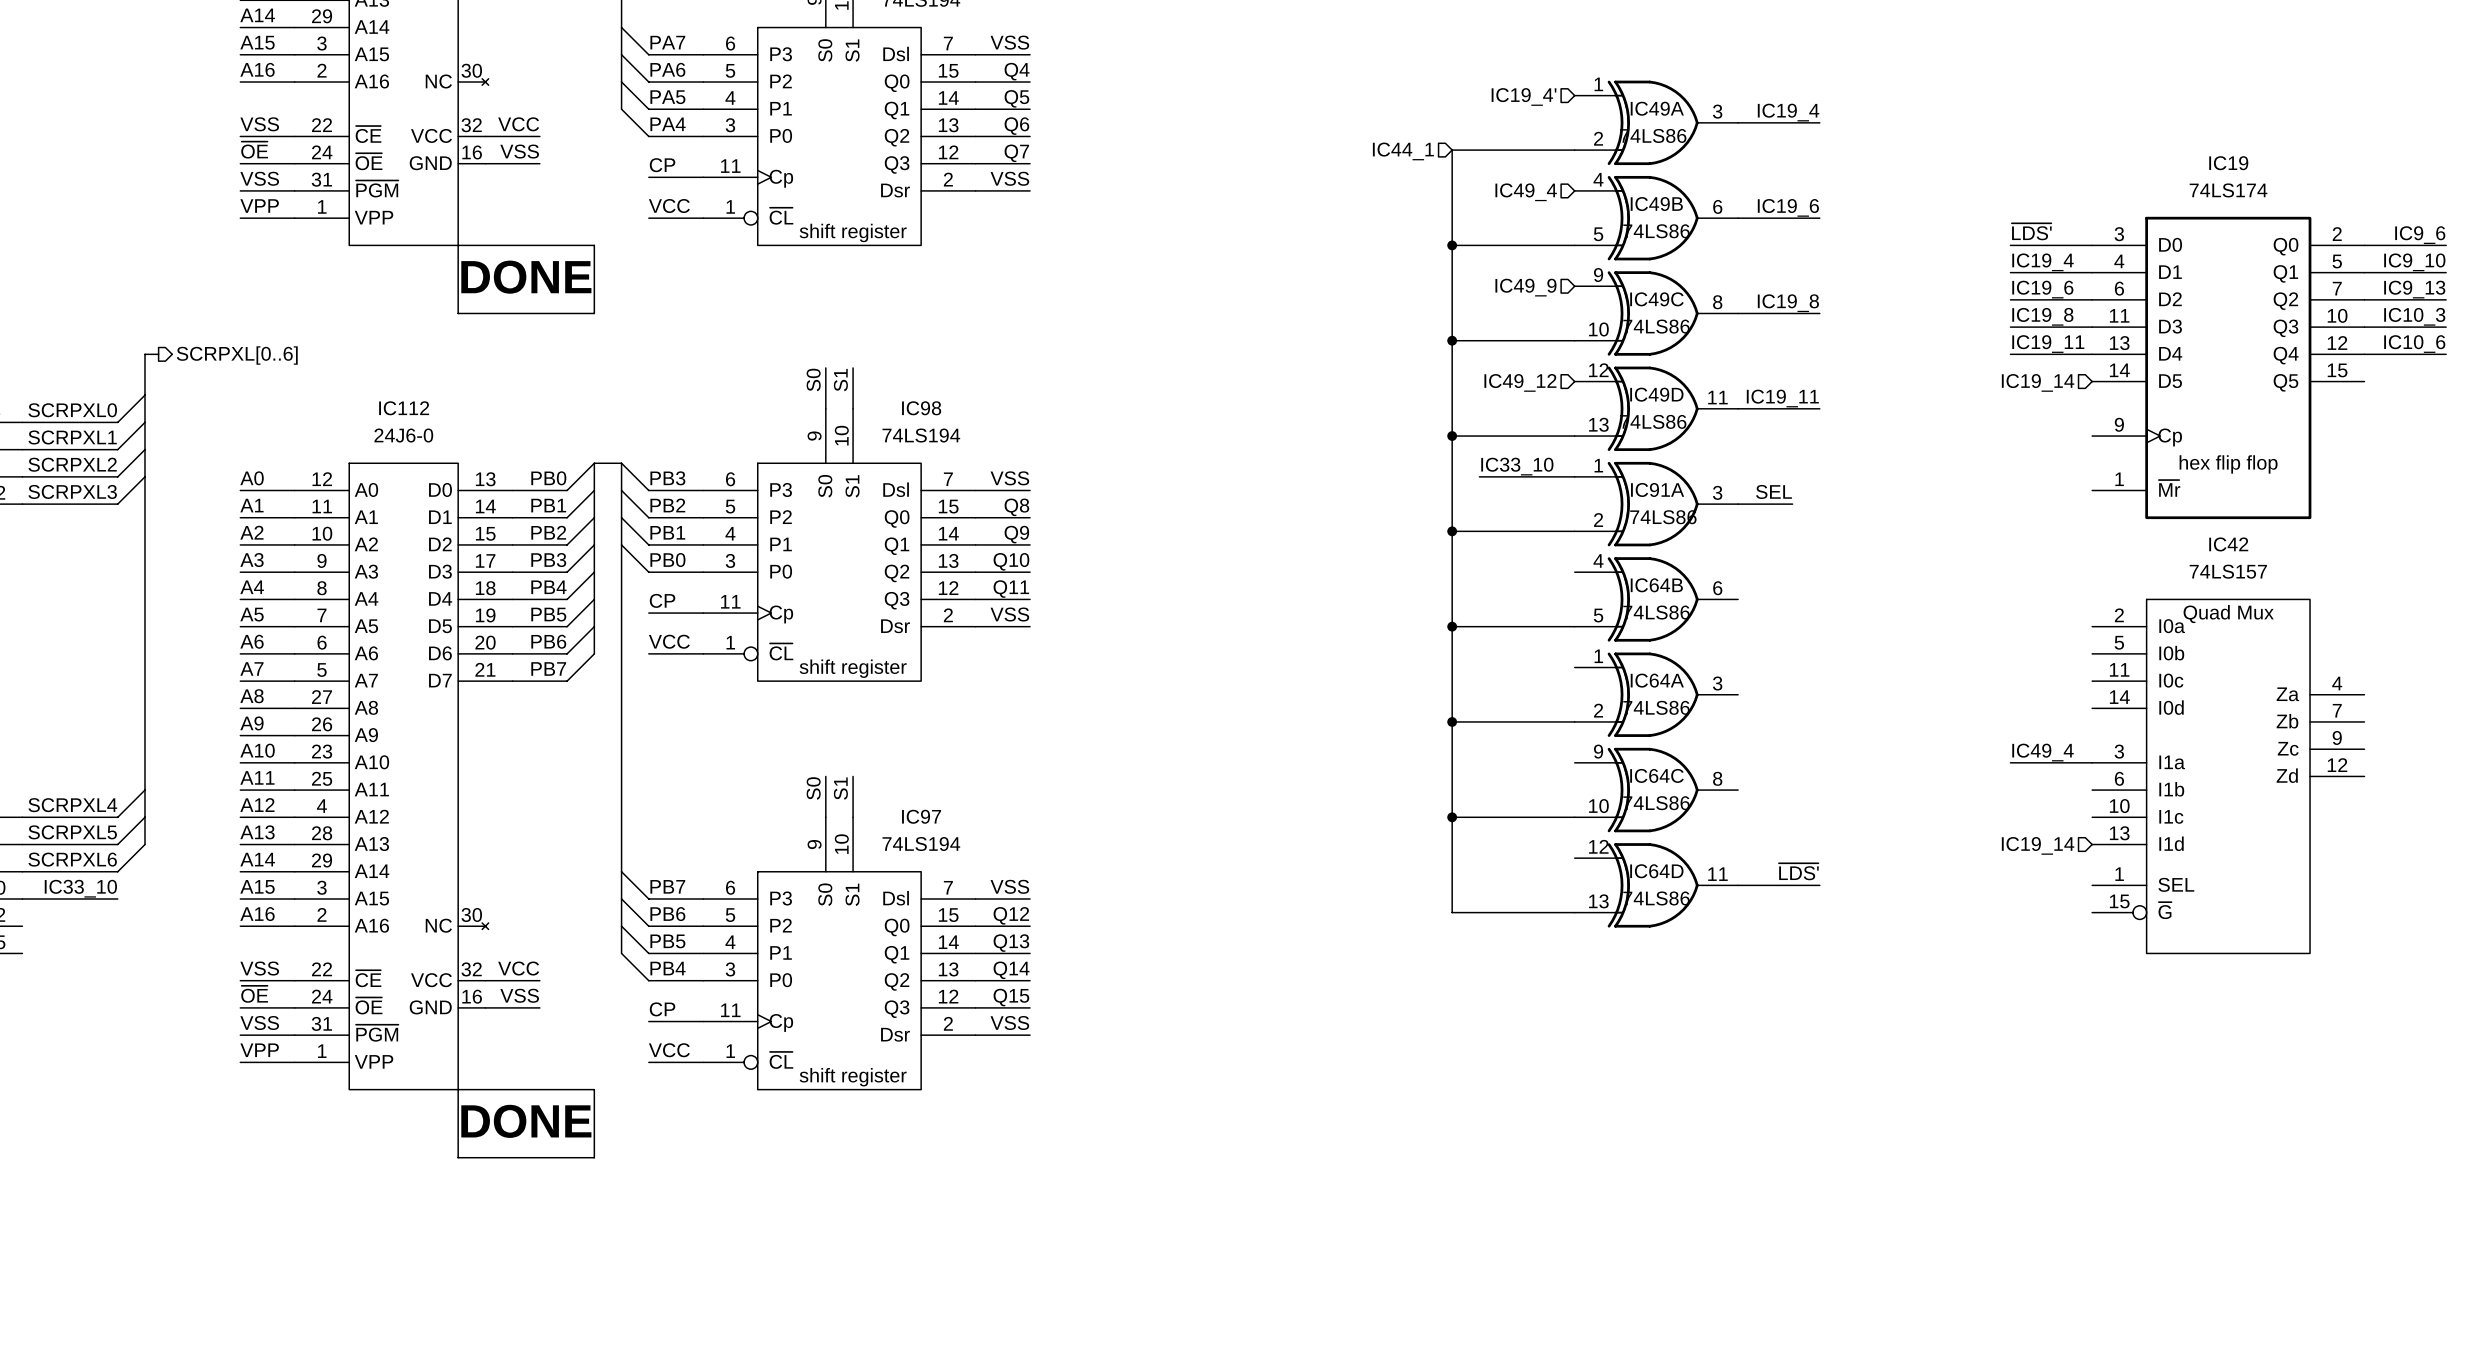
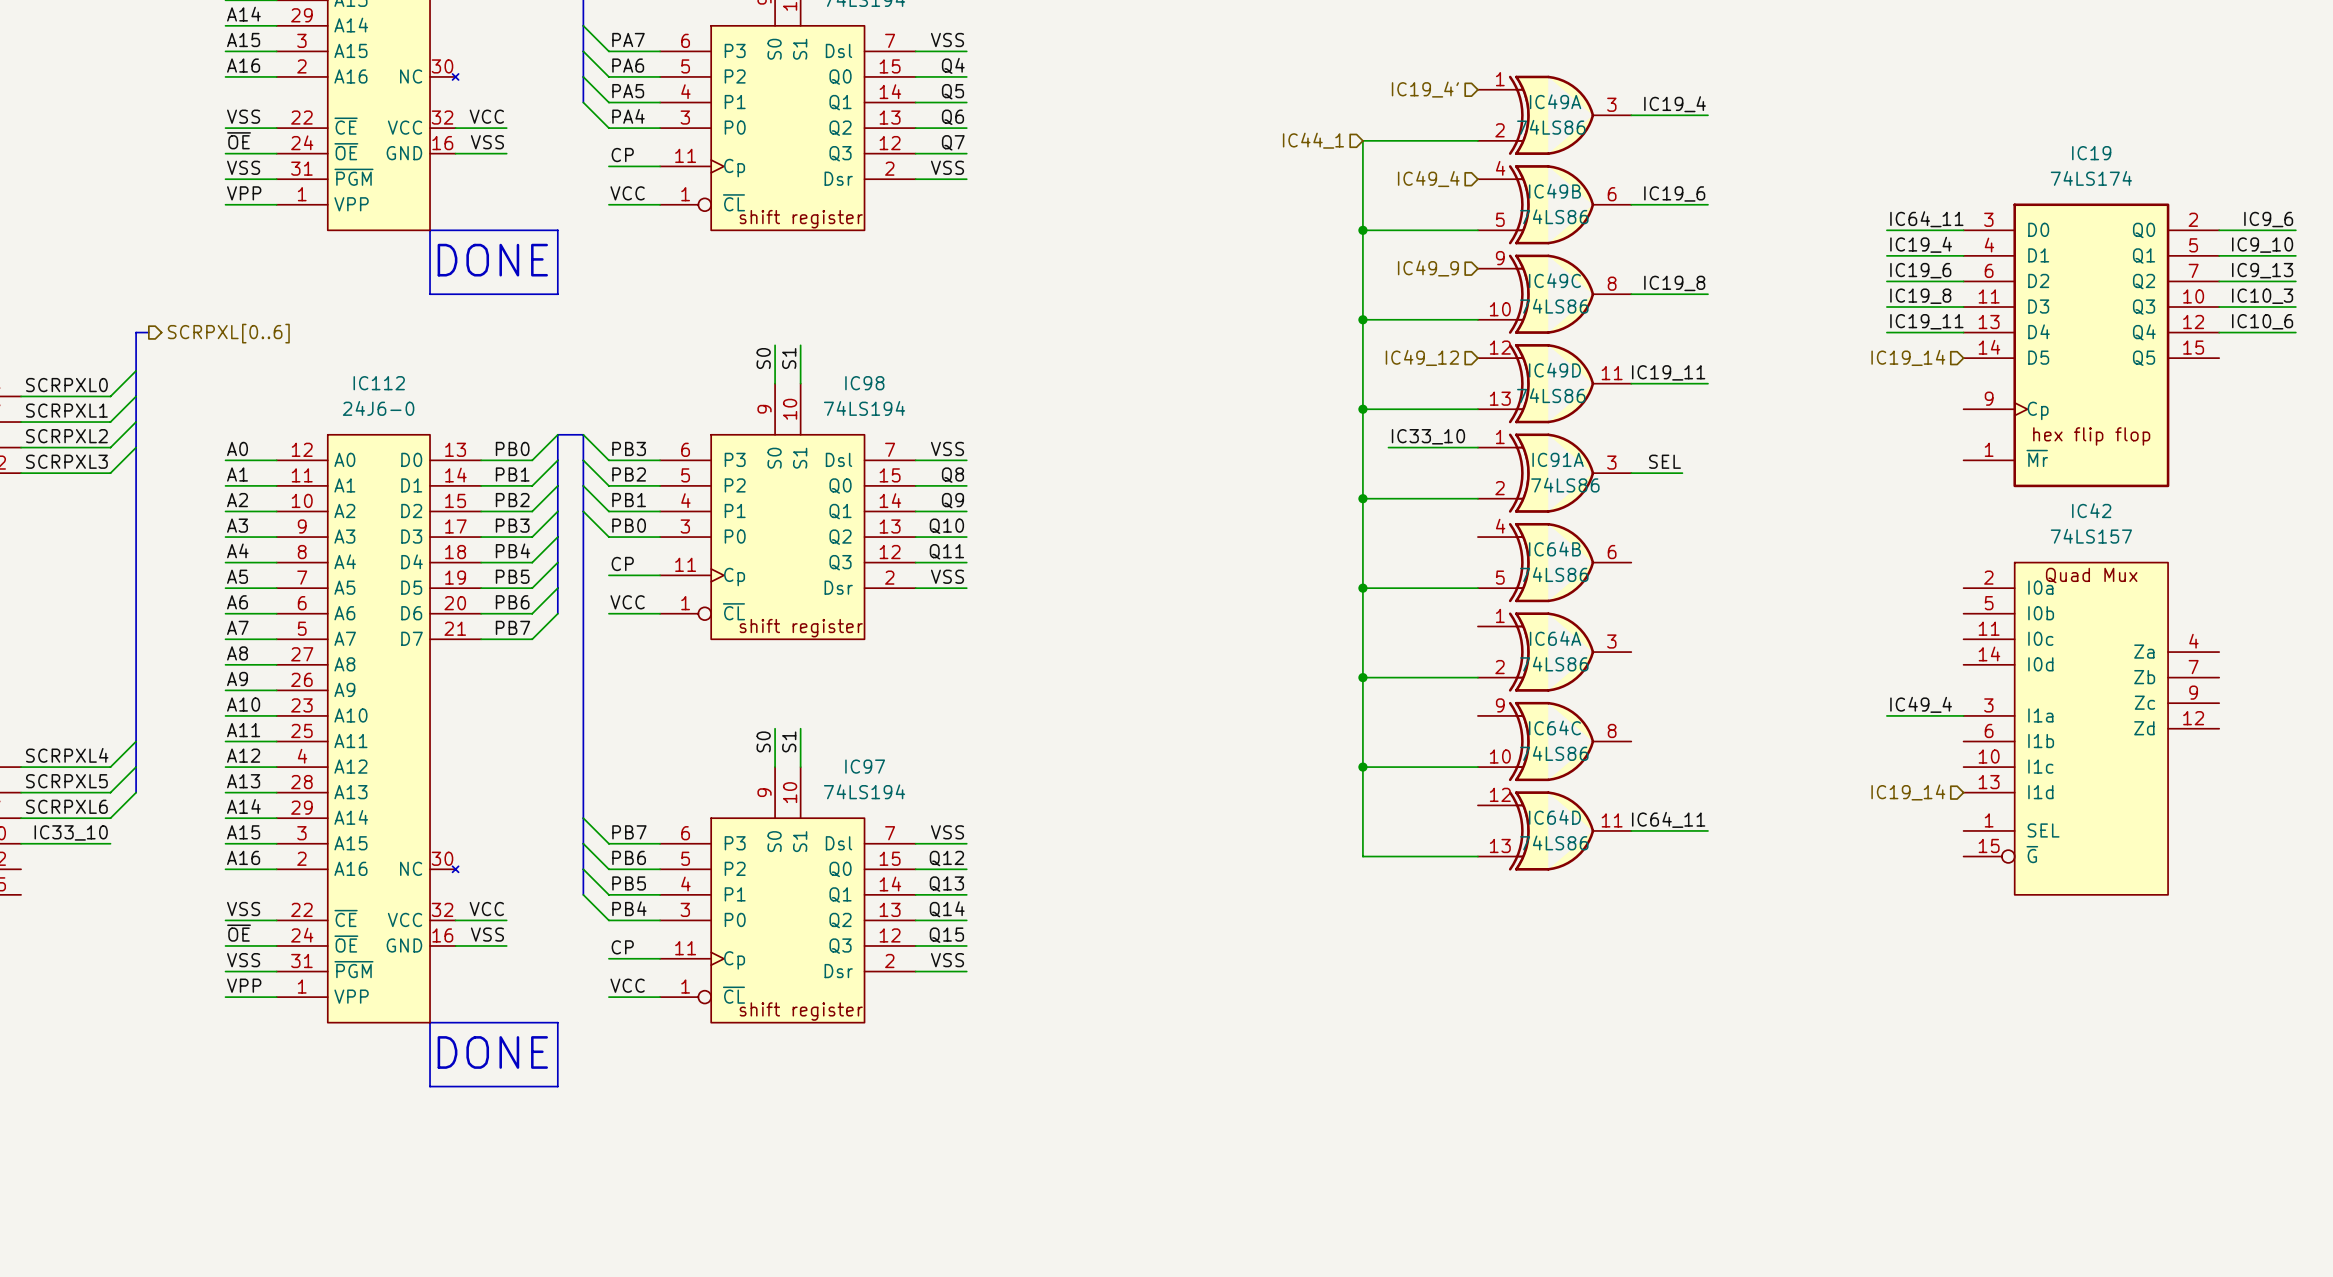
label: ~{LDS'} (2031, 231) -> IC64_11 (1926, 219)
label: ~{LDS'} (1798, 871) -> IC64_11 (1668, 819)

